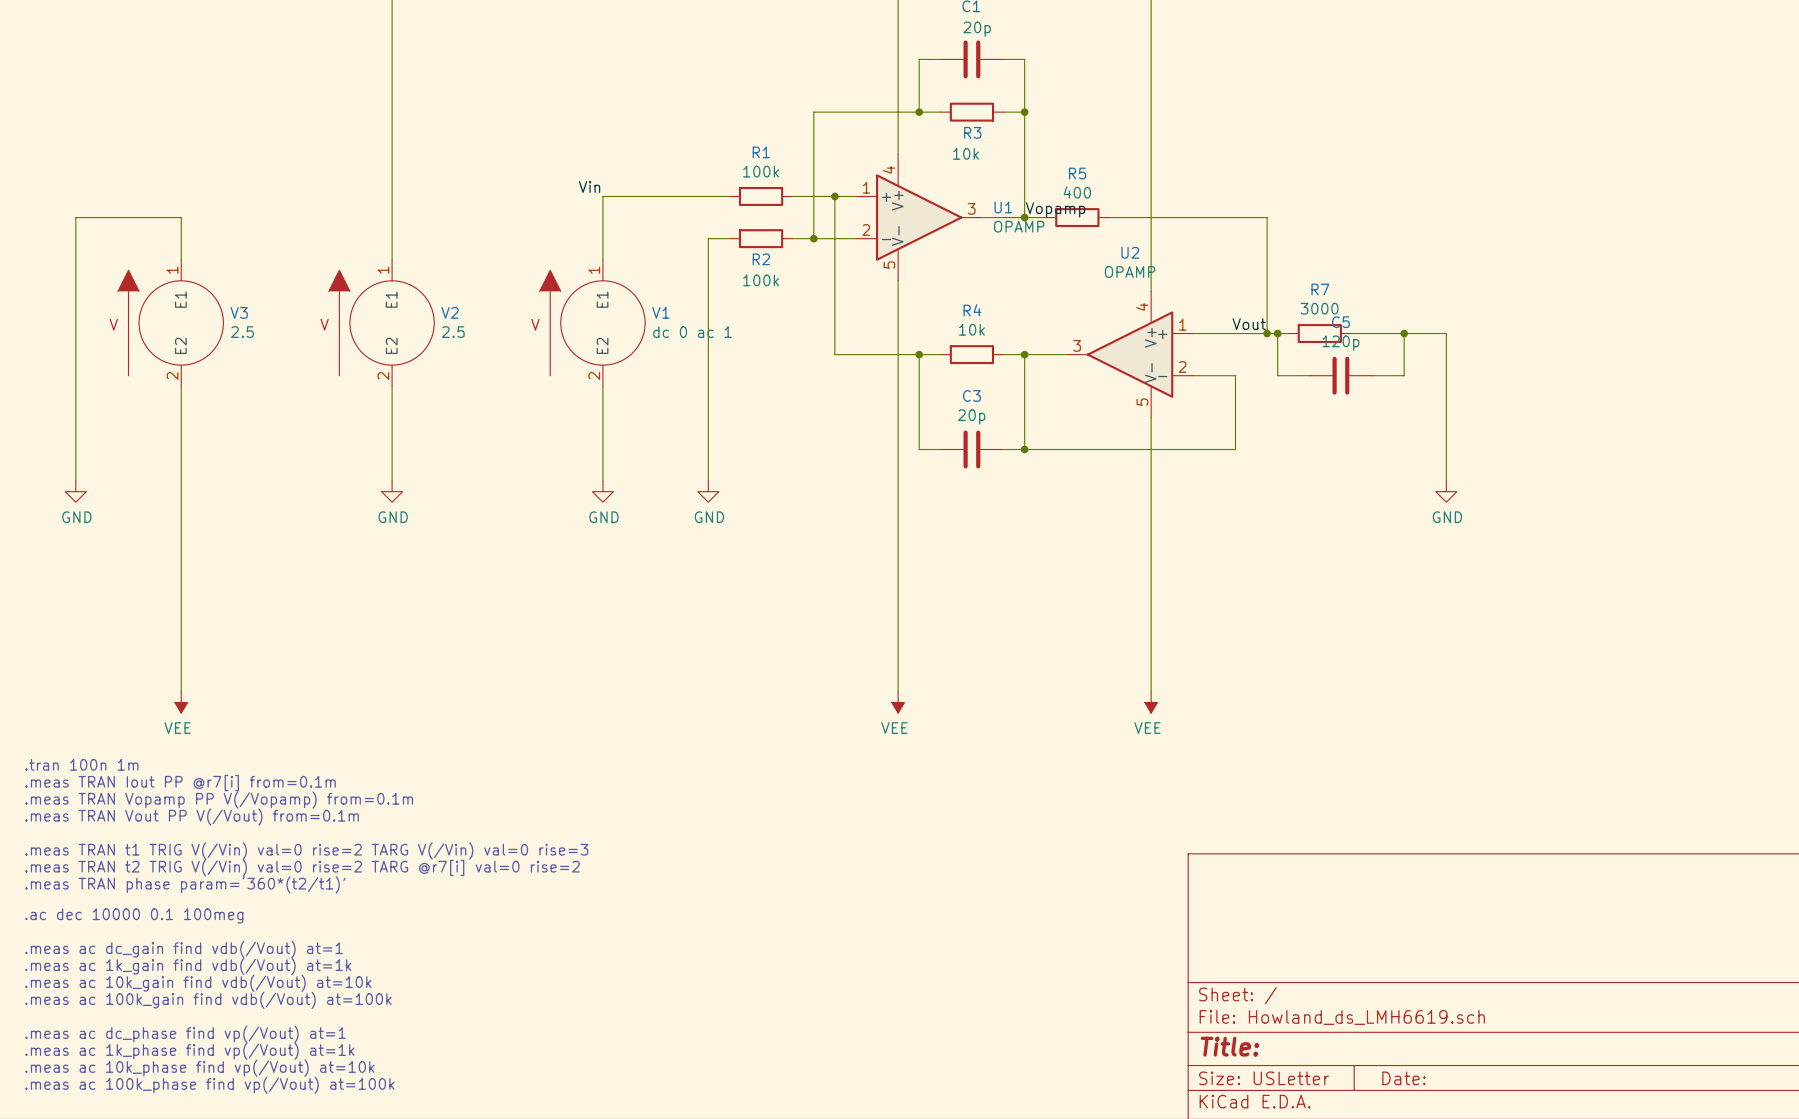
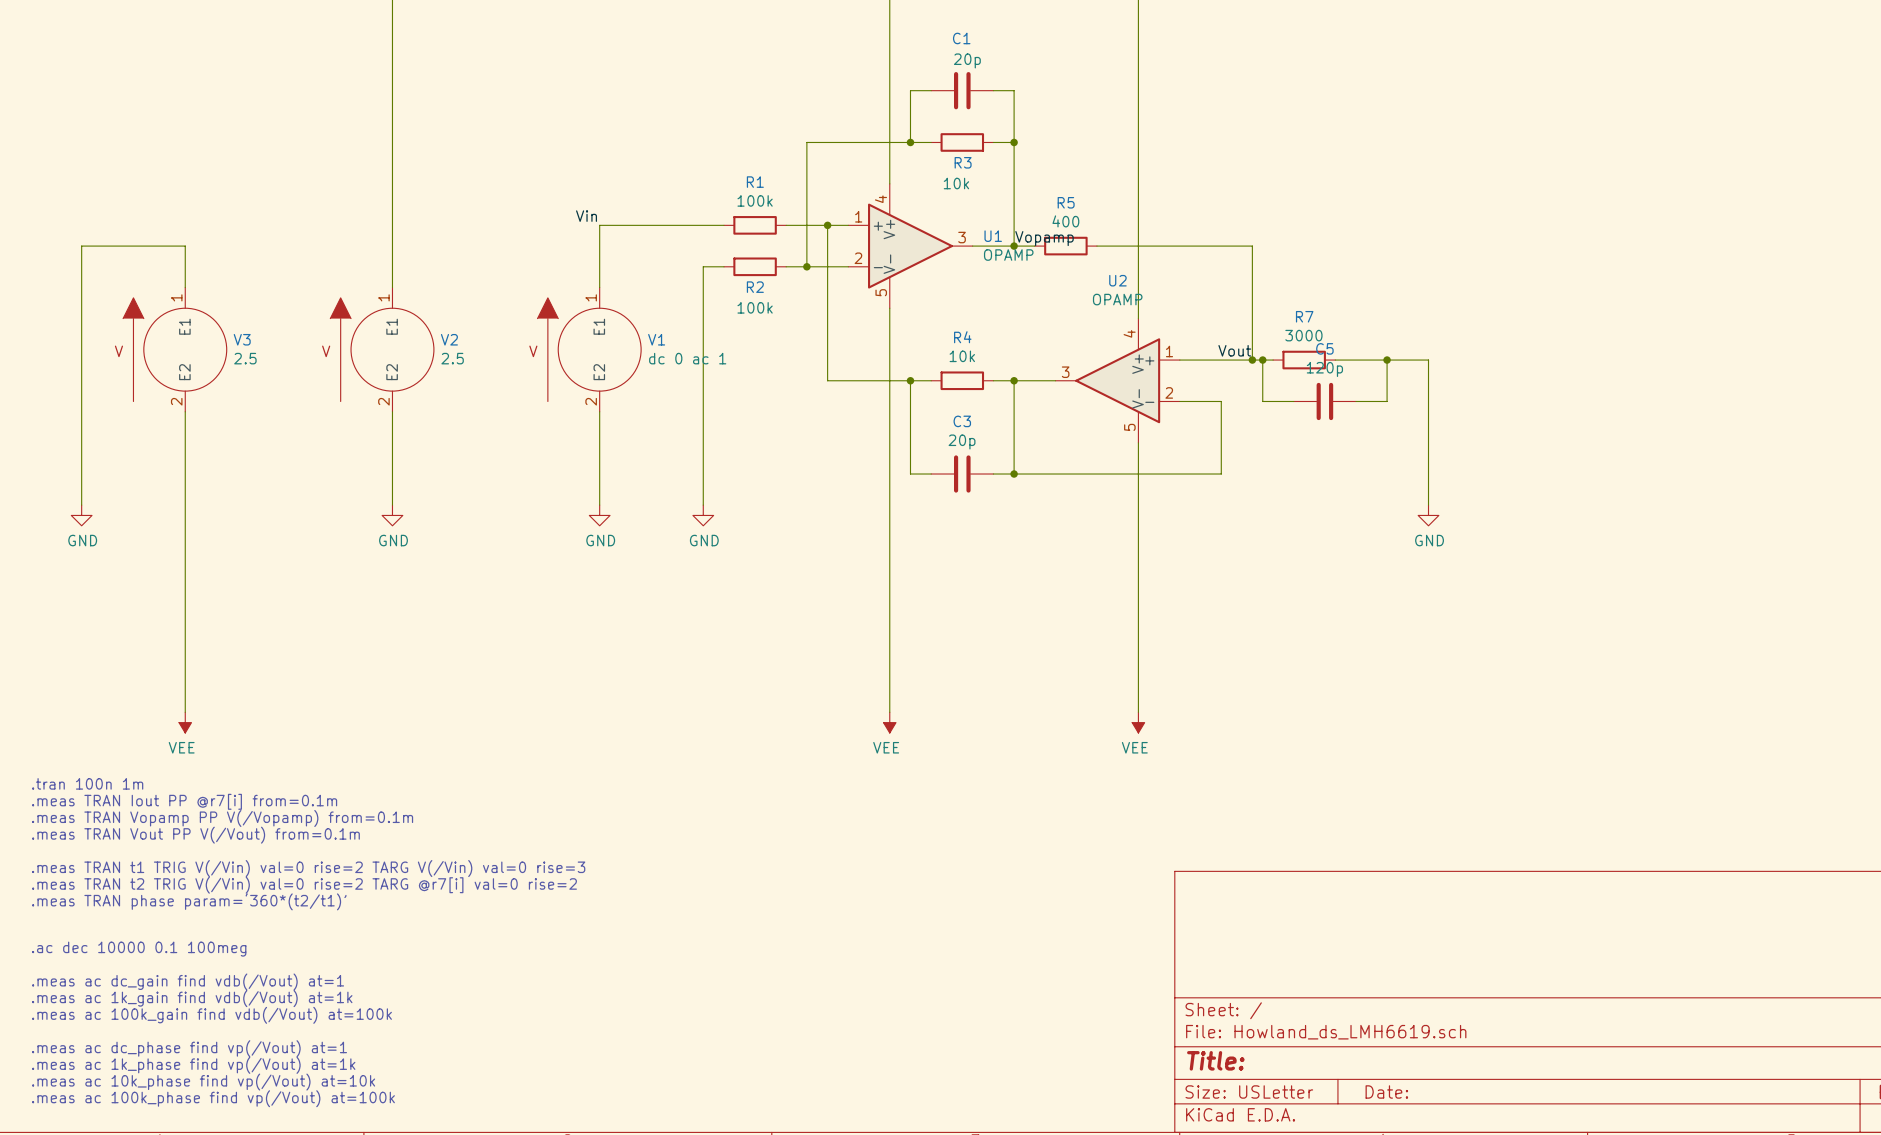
text position: .ac dec 10000 0.1 100meg (134, 915) -> .ac dec 10000 0.1 100meg (139, 949)
text: .meas ac dc_gain find vdb(/Vout) at=1 (184, 949) -> none
text: .meas ac 1k_gain find vdb(/Vout) at=1k (188, 966) -> .meas ac dc_gain find vdb(/Vout) at=1 (188, 981)
text: .meas ac 10k_gain find vdb(/Vout) at=10k (198, 983) -> .meas ac 1k_gain find vdb(/Vout) at=1k (192, 998)

